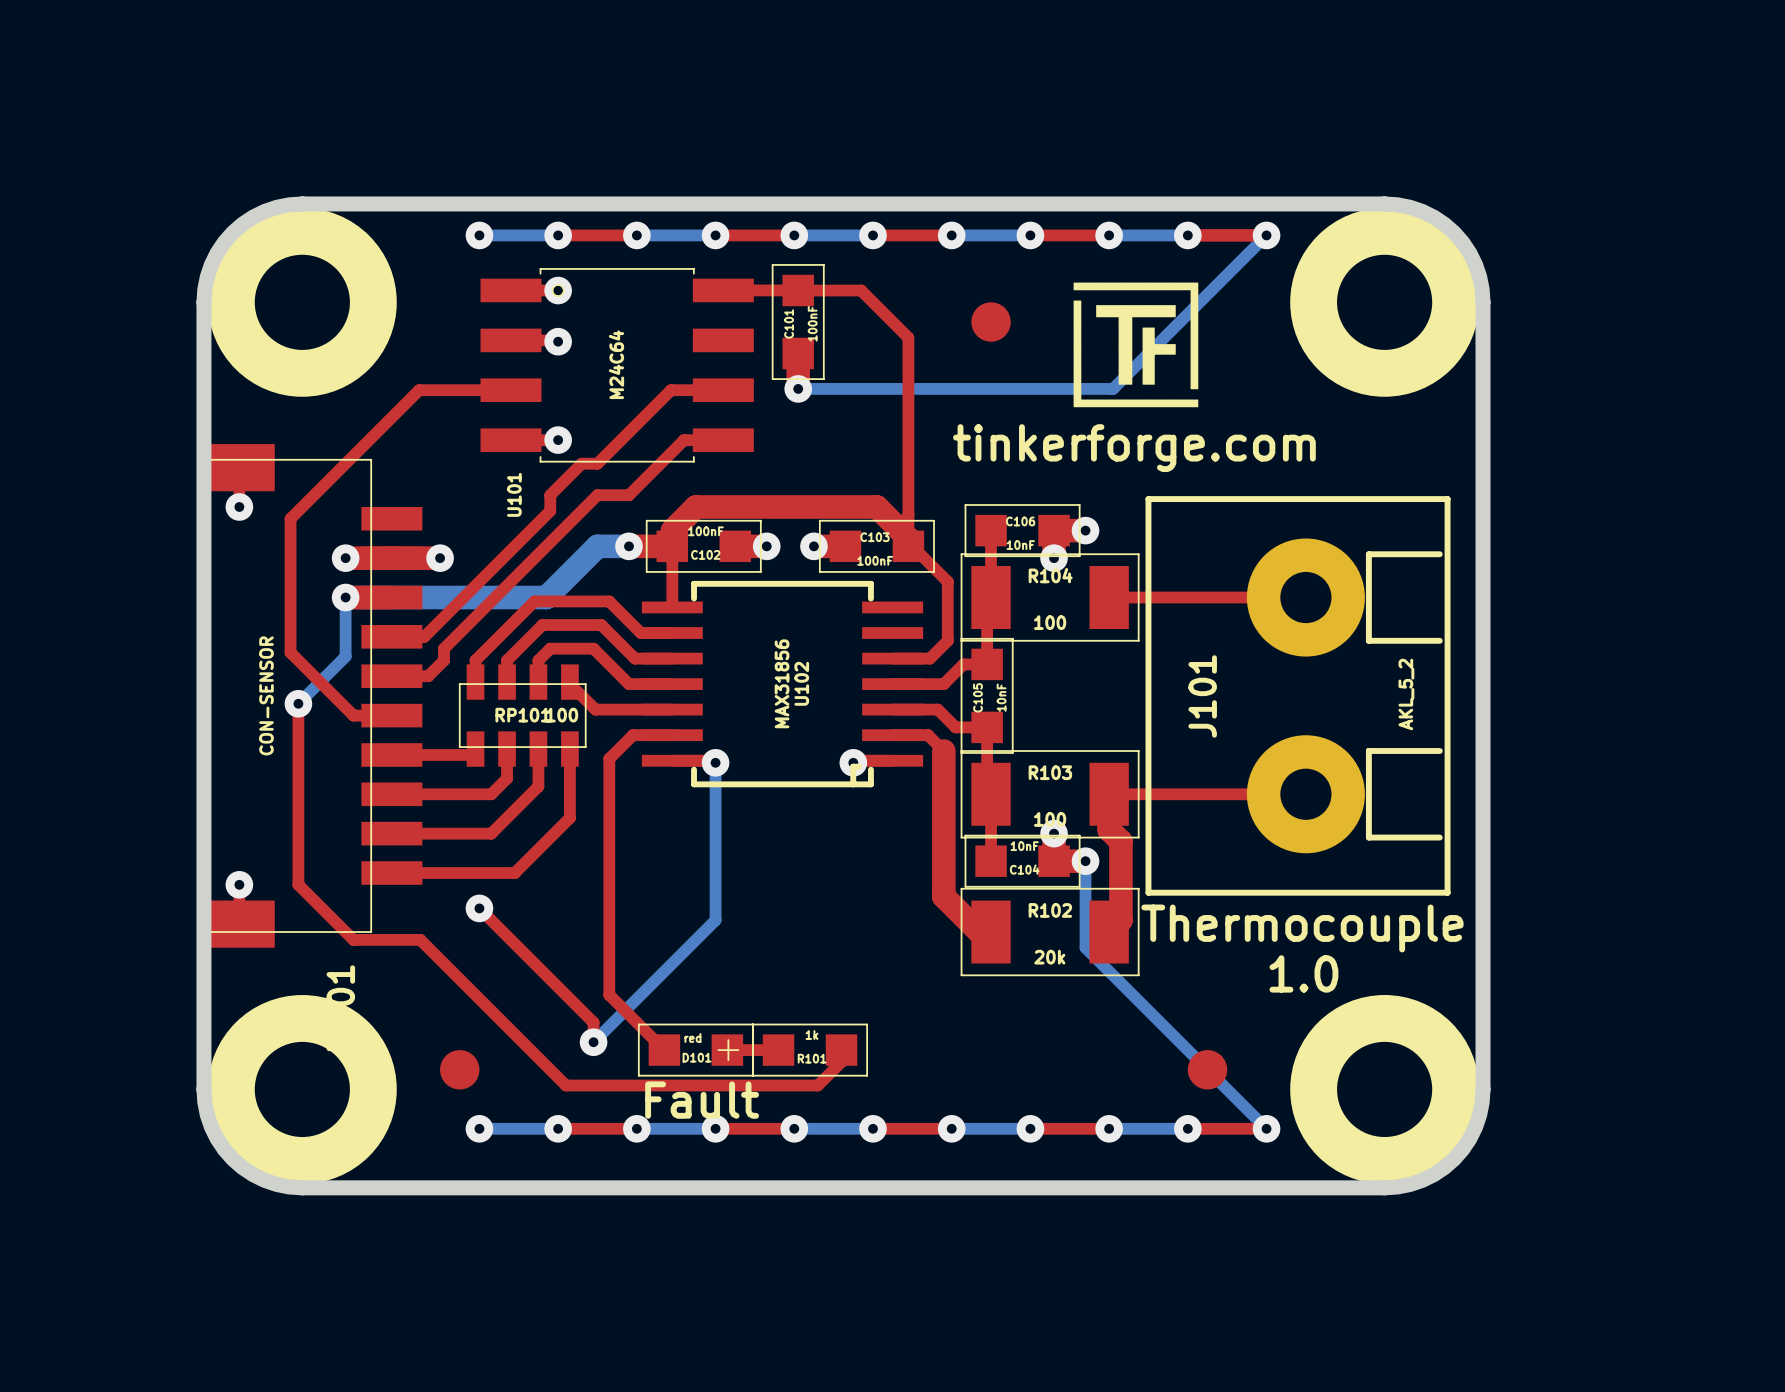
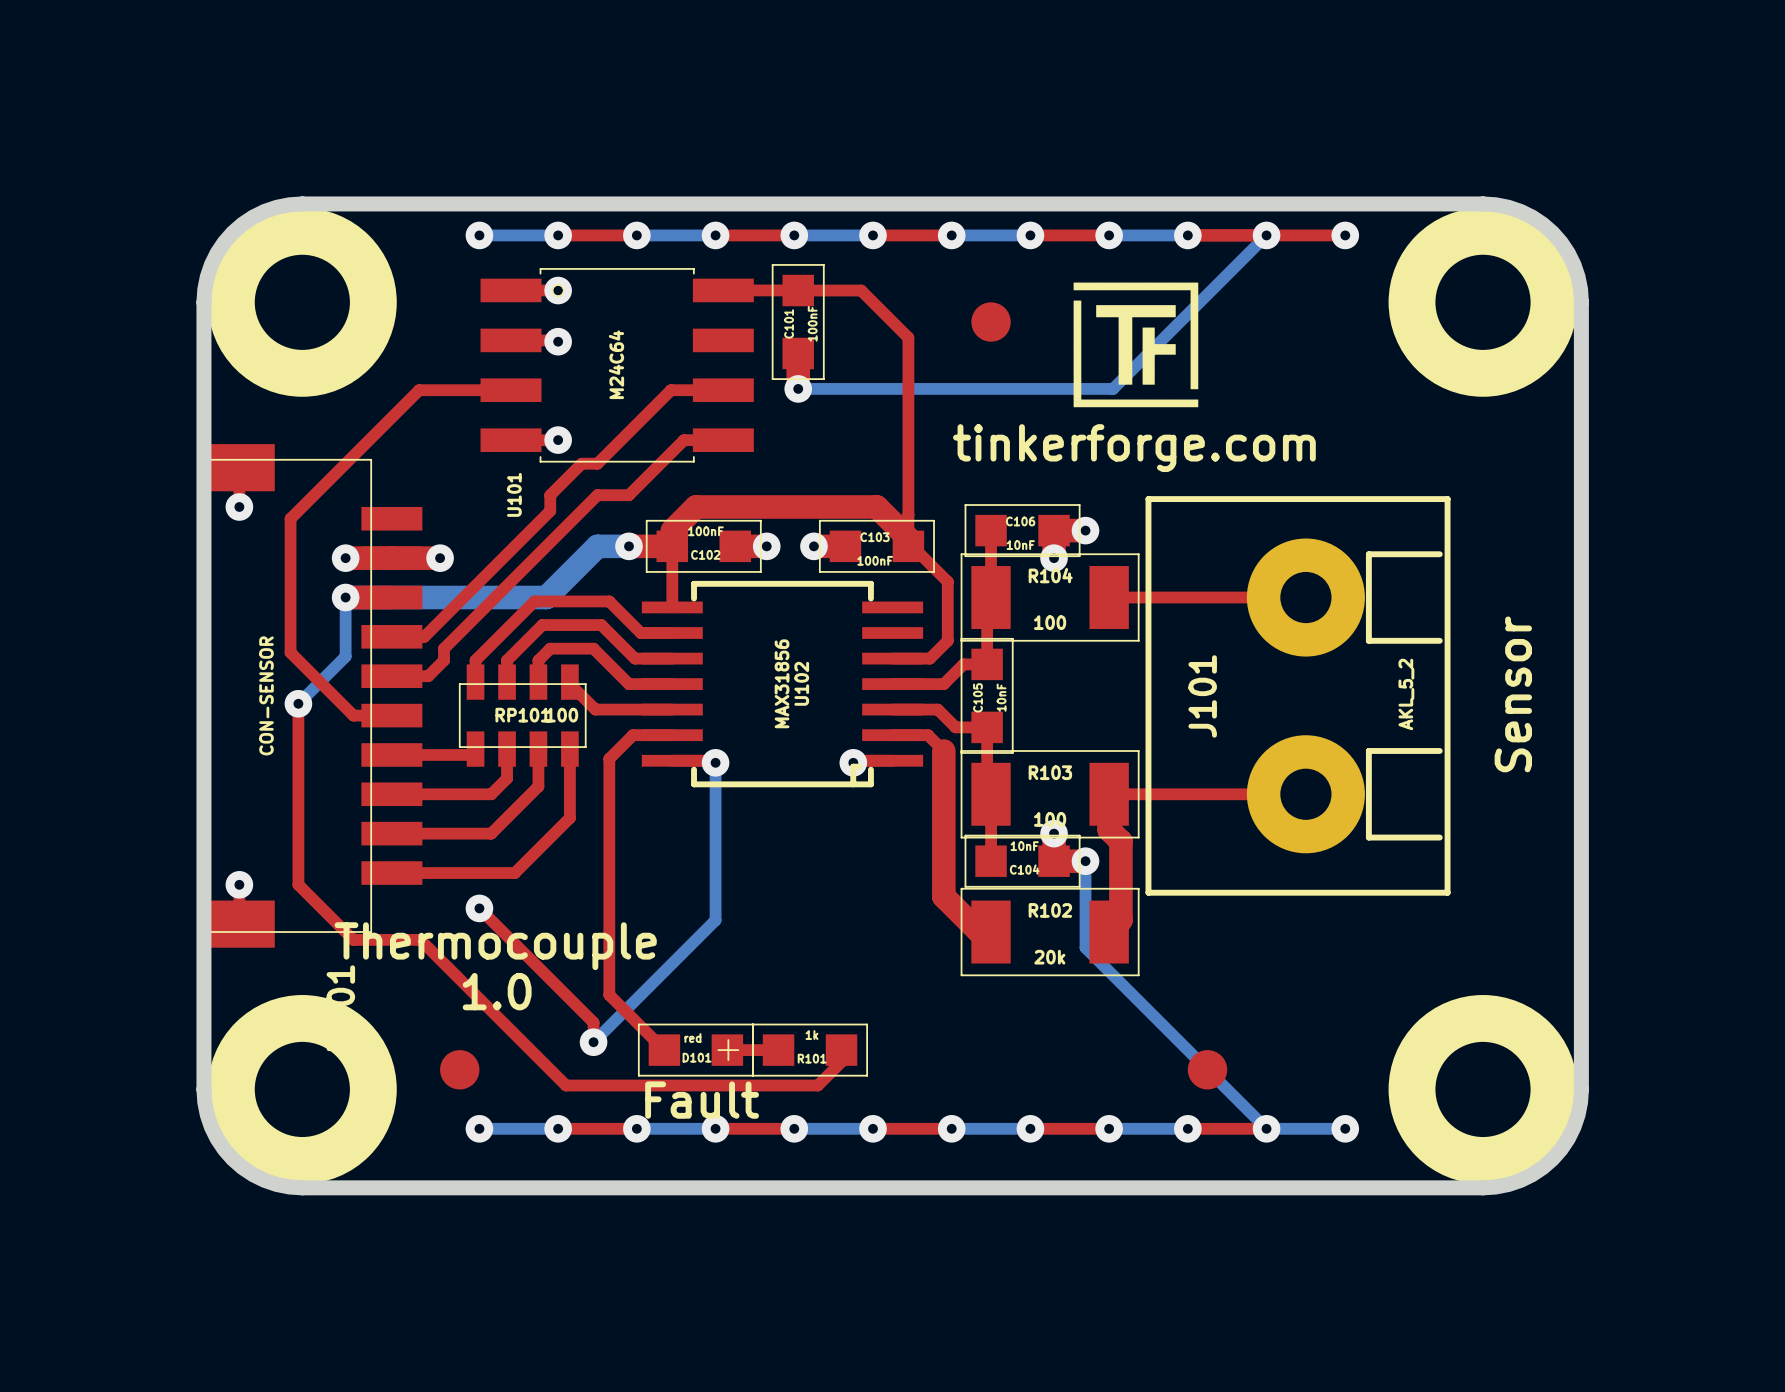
board edge: (1384, 203) (1397, 204) (1422, 211) (1444, 224) (1454, 232) (1462, 242) (1475, 264) (1482, 289) (1483, 302) (1482, 1102) (1479, 1114) (1469, 1138) (1454, 1159) (1433, 1174) (1422, 1180) (1397, 1187) (1384, 1187) -> (1384, 203) (1495, 204) (1520, 211) (1532, 217) (1552, 232) (1568, 253) (1578, 276) (1581, 302) (1581, 1089) (1578, 1114) (1568, 1138) (1552, 1159) (1532, 1174) (1520, 1180) (1495, 1187) (1483, 1187) (1384, 1187)
top track: none -> (1266, 235) (1345, 235)
via: none -> (1345, 235)
part position: (1384, 302) -> (1483, 302)
text: none -> Sensor (1513, 694)
text position: Thermocouple (1302, 928) -> Thermocouple (495, 946)
text position: 1.0 (1303, 973) -> 1.0 (497, 991)
part position: (1384, 1089) -> (1483, 1089)
bottom track: none -> (1266, 1128) (1345, 1128)
via: none -> (1345, 1128)

